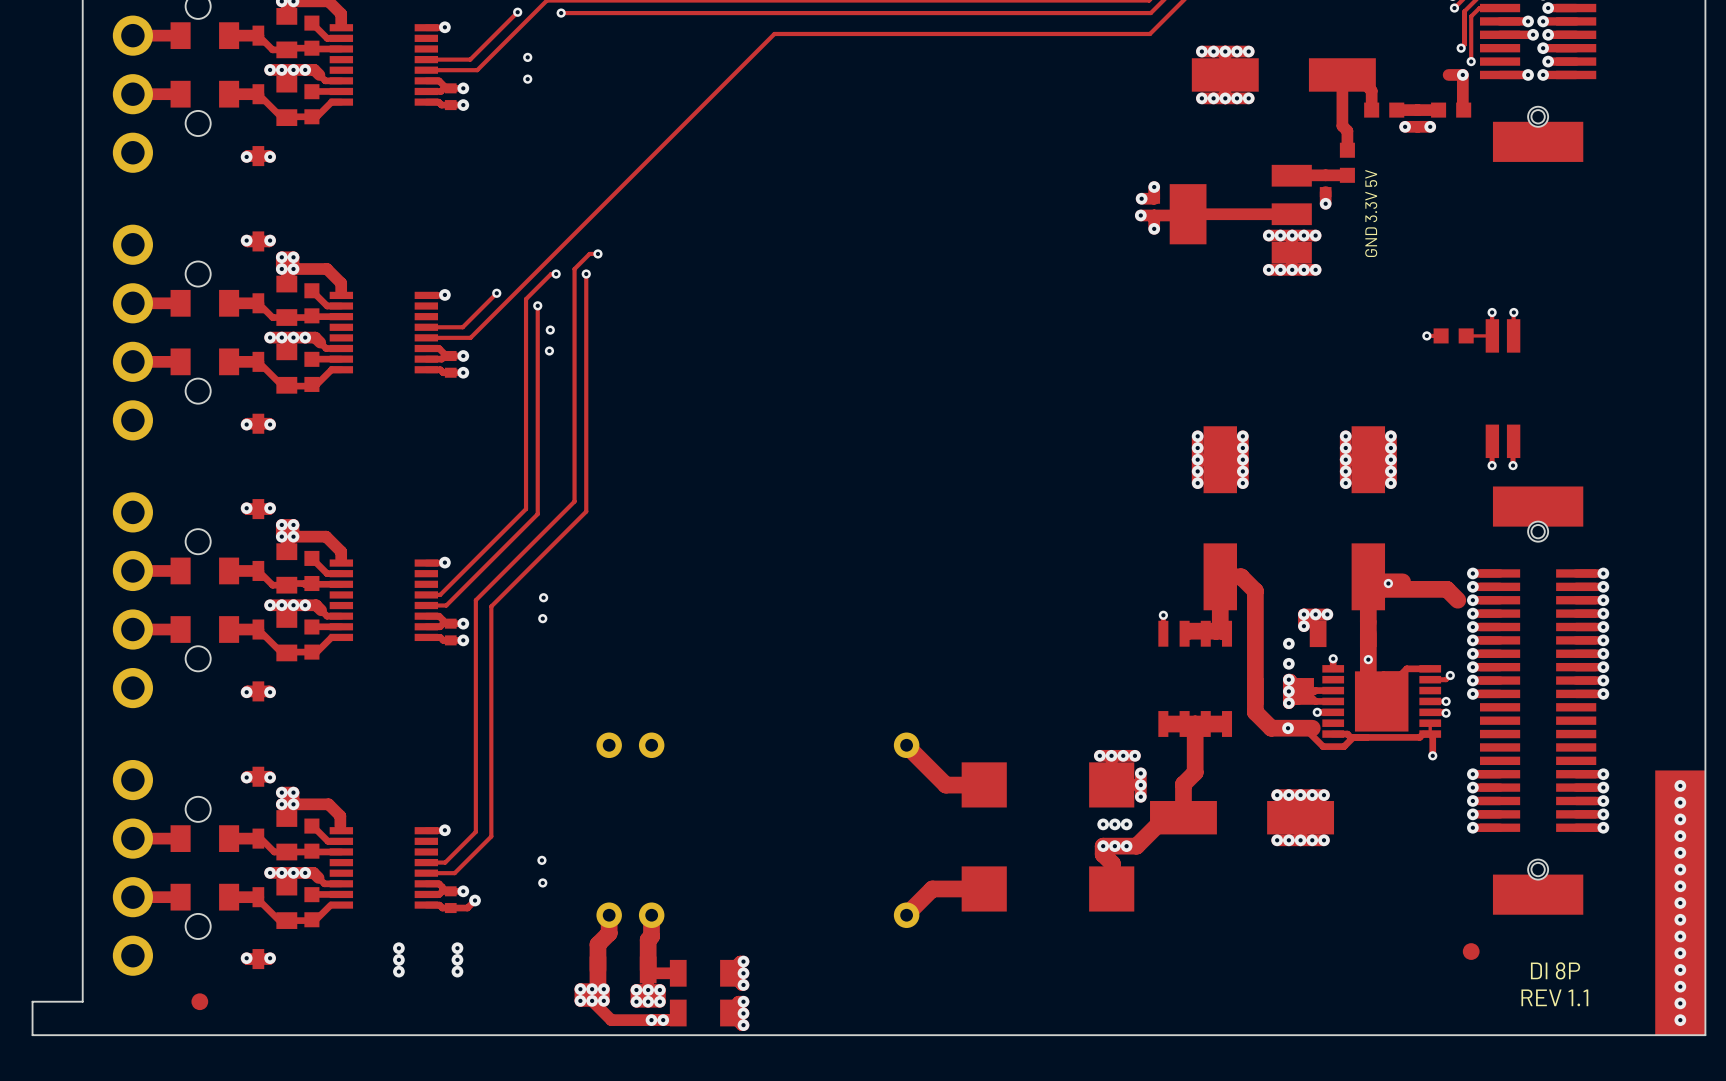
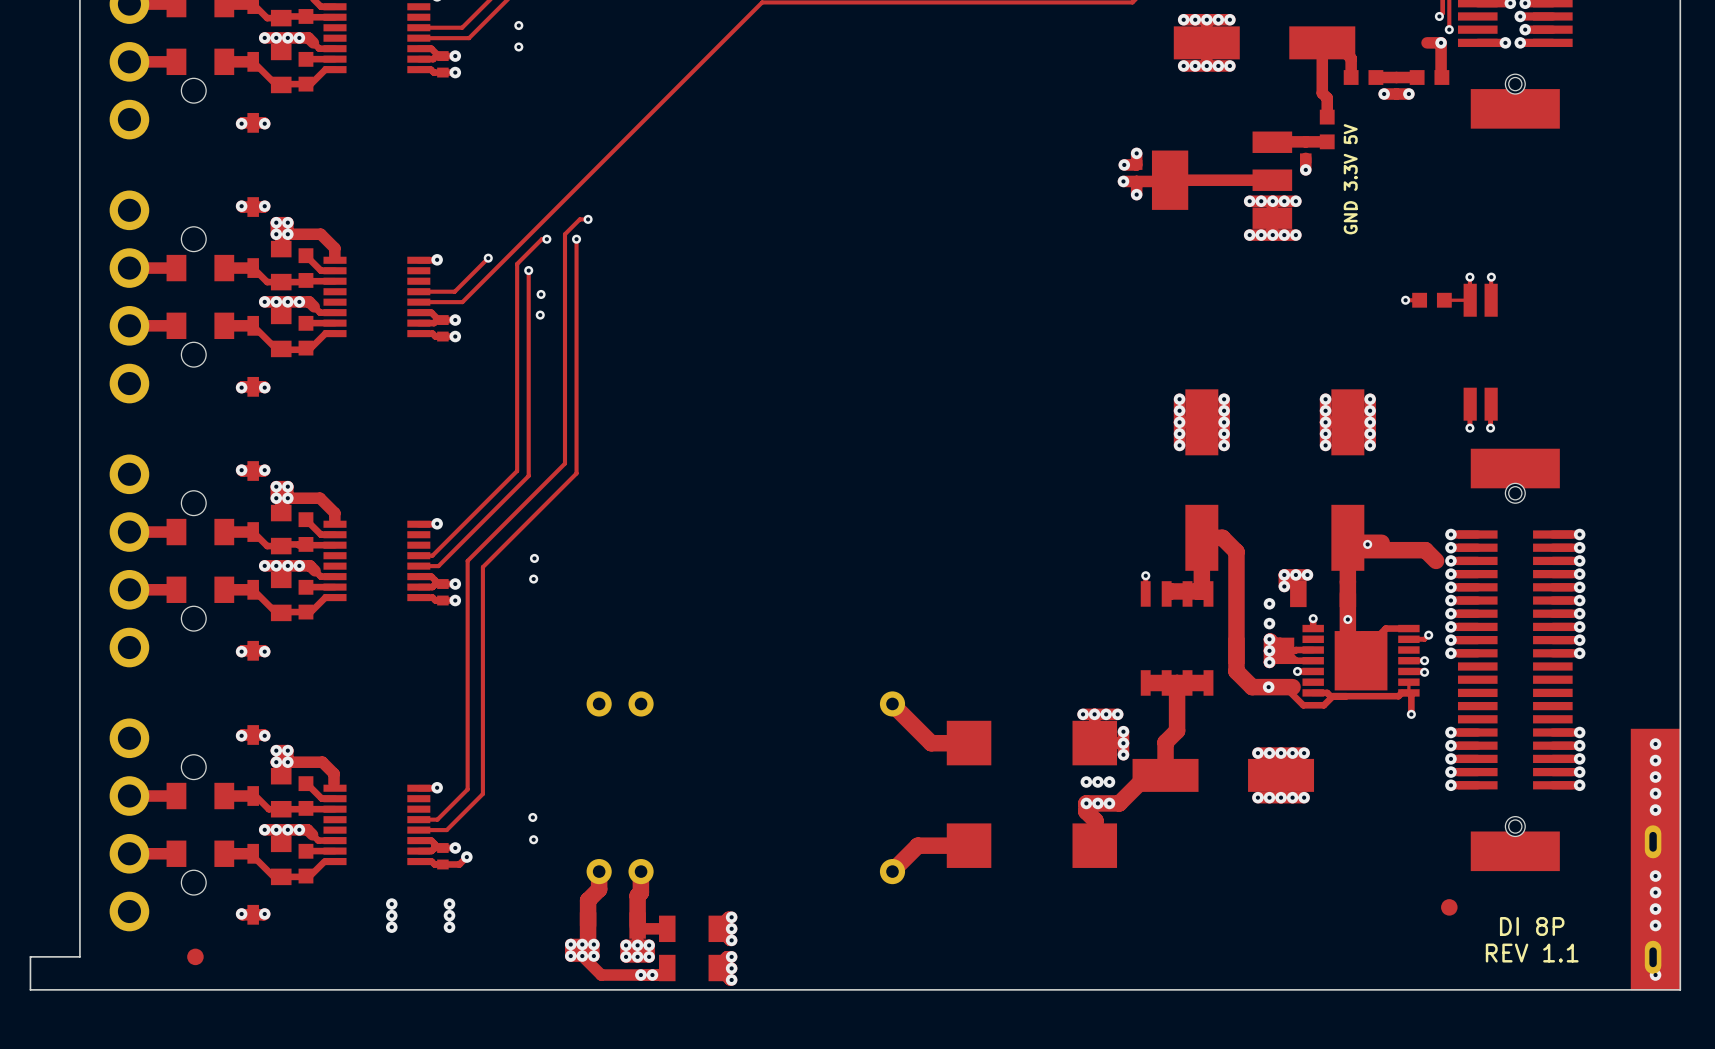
part footprint: [1655, 770, 1706, 1036] -> [1630, 728, 1681, 991]
via: (1680, 869) -> none
via: (1680, 886) -> none
via: (1680, 903) -> none
via: (1680, 986) -> none
via: (1680, 1003) -> none

